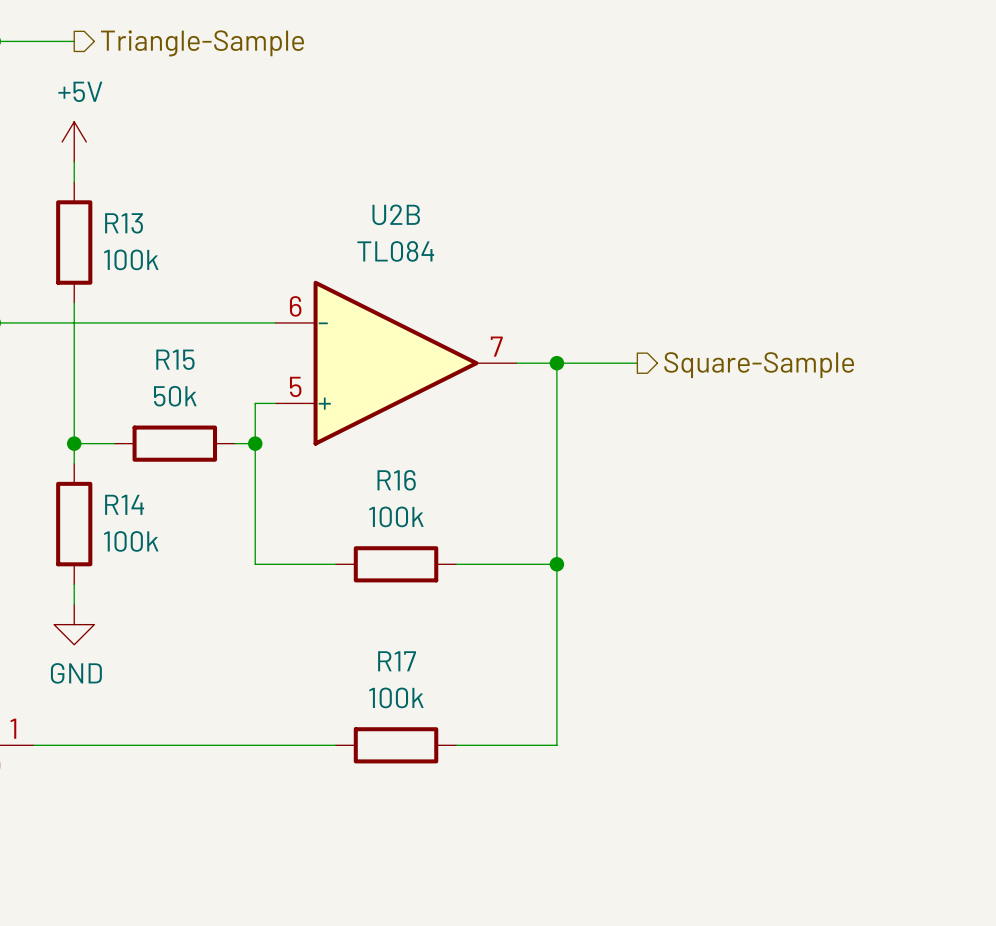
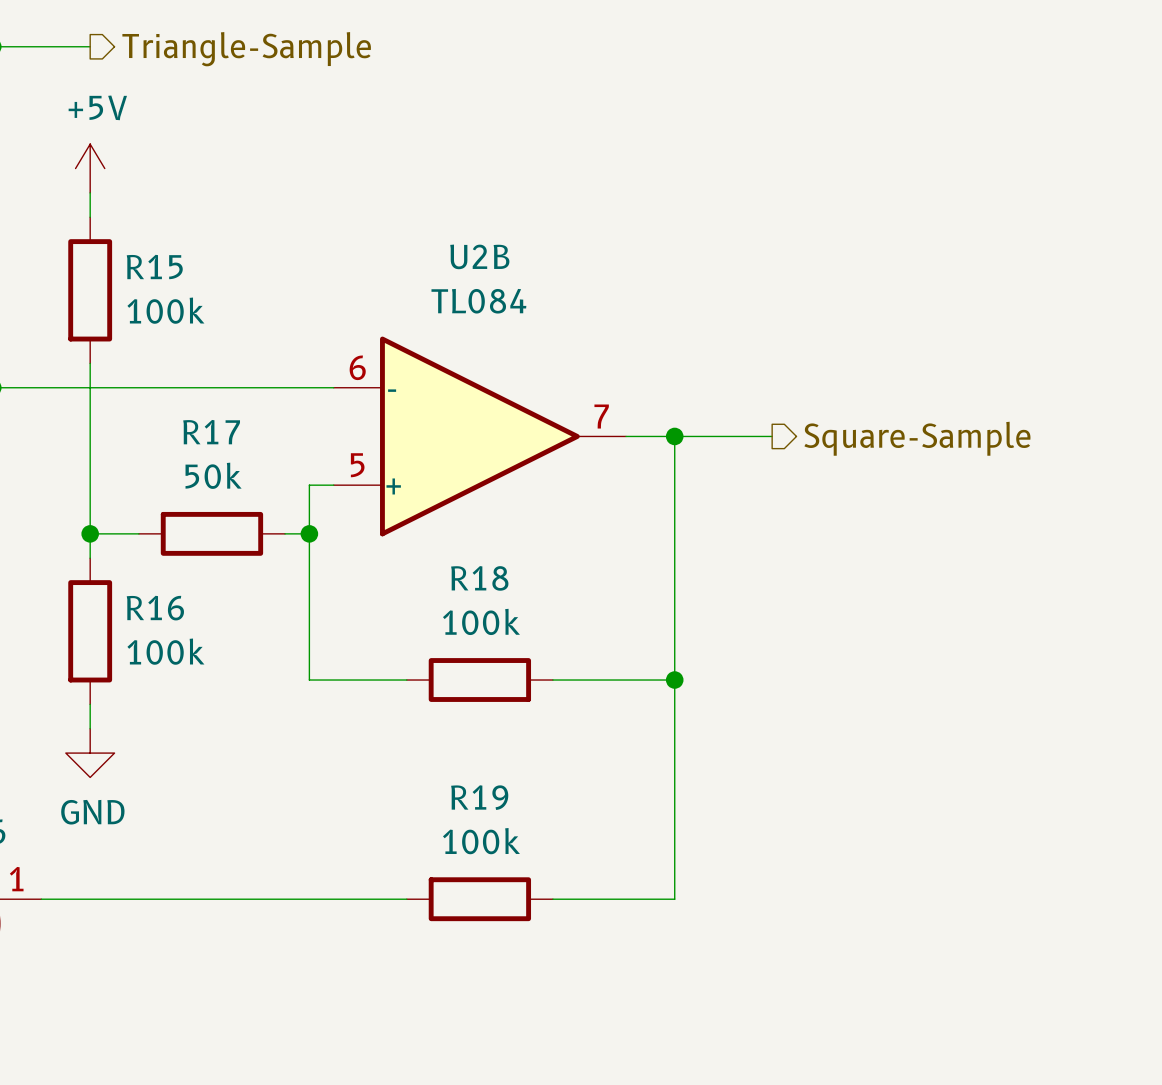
R13 name: R13 (124, 223) -> R15 (154, 267)
R15 name: R15 (175, 359) -> R17 (211, 432)
R16 name: R16 (396, 480) -> R18 (479, 578)
R14 name: R14 (124, 504) -> R16 (155, 608)
R17 name: R17 (397, 661) -> R19 (479, 797)

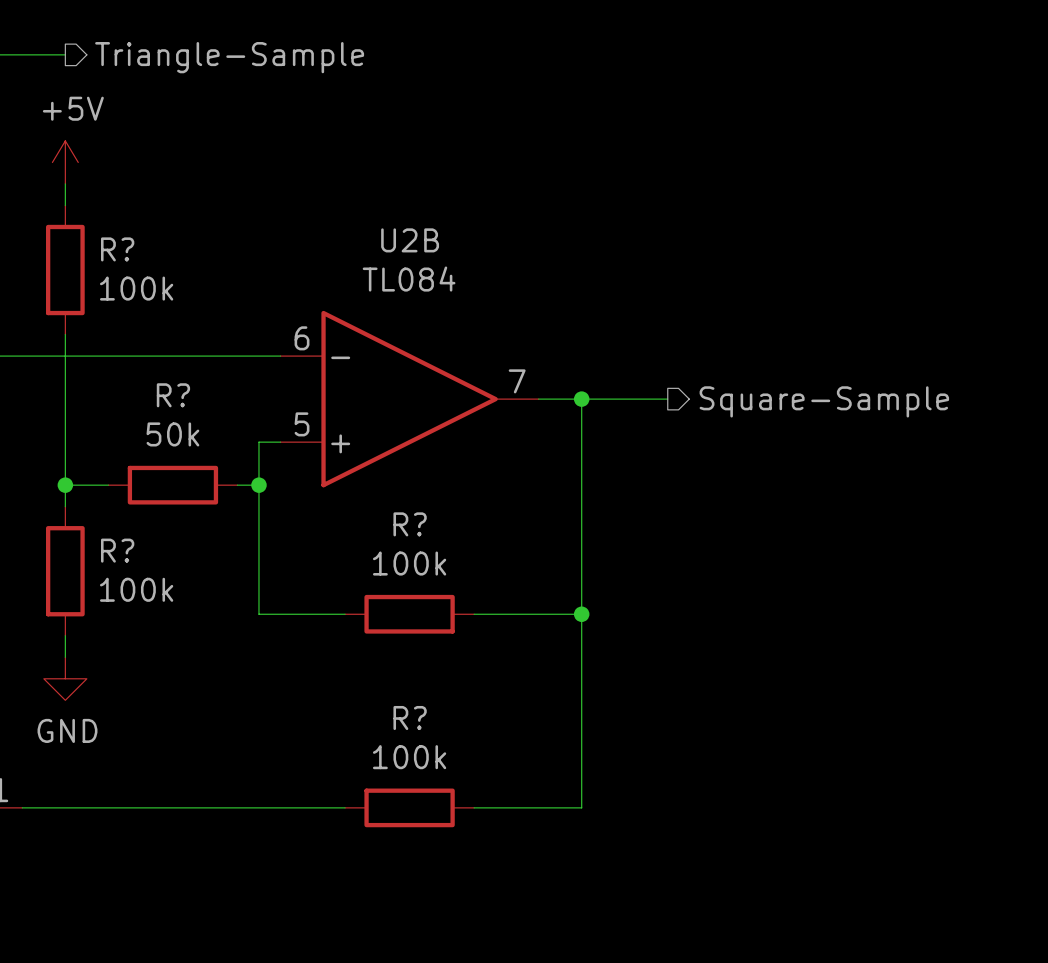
R15 name: R15 (154, 267) -> R? (117, 249)
R17 name: R17 (211, 432) -> R? (173, 395)
R18 name: R18 (479, 578) -> R? (410, 524)
R16 name: R16 (155, 608) -> R? (117, 550)
R19 name: R19 (479, 797) -> R? (410, 718)

